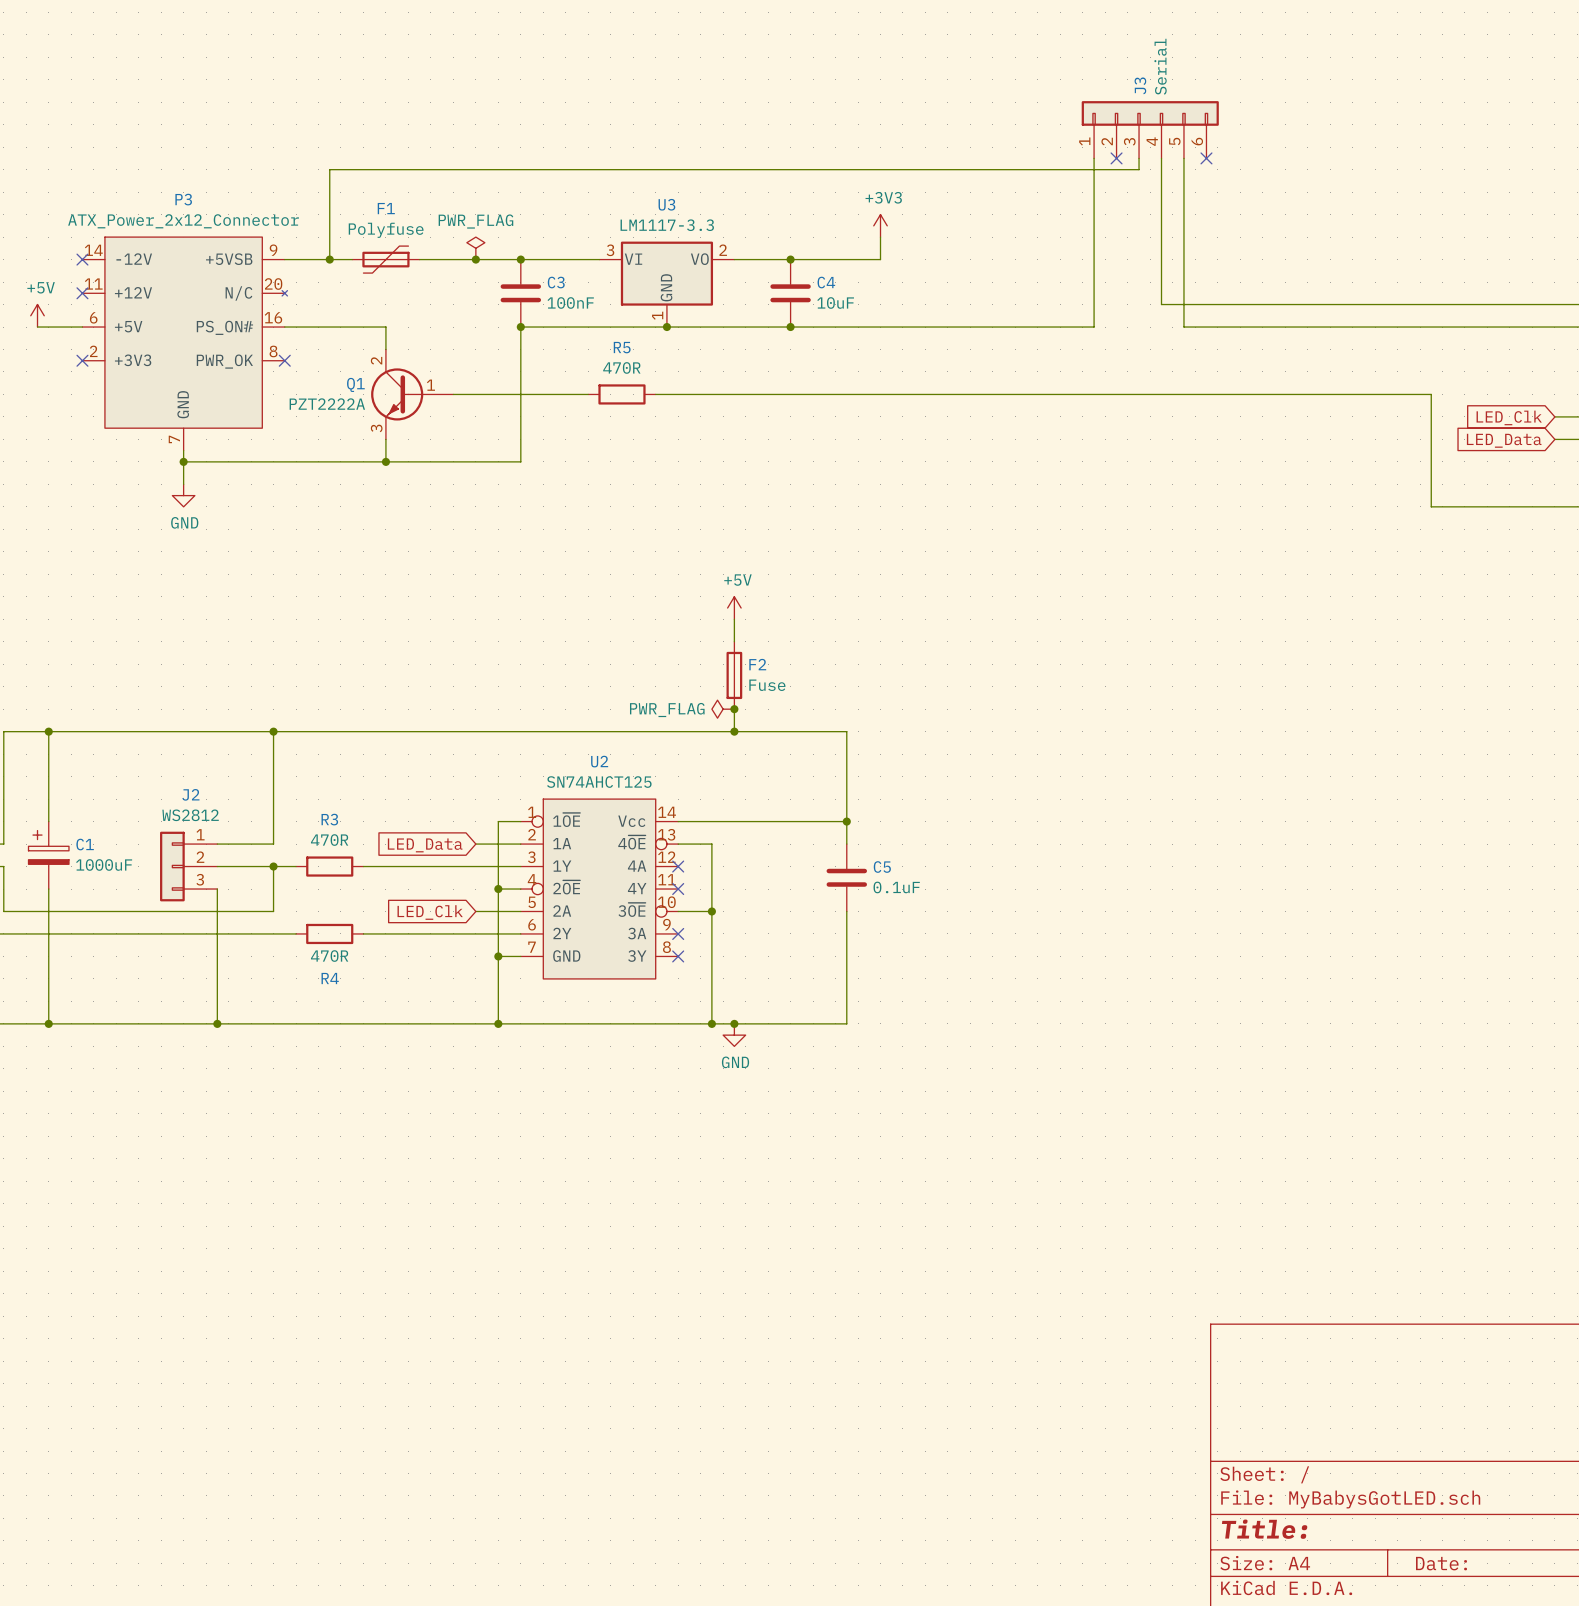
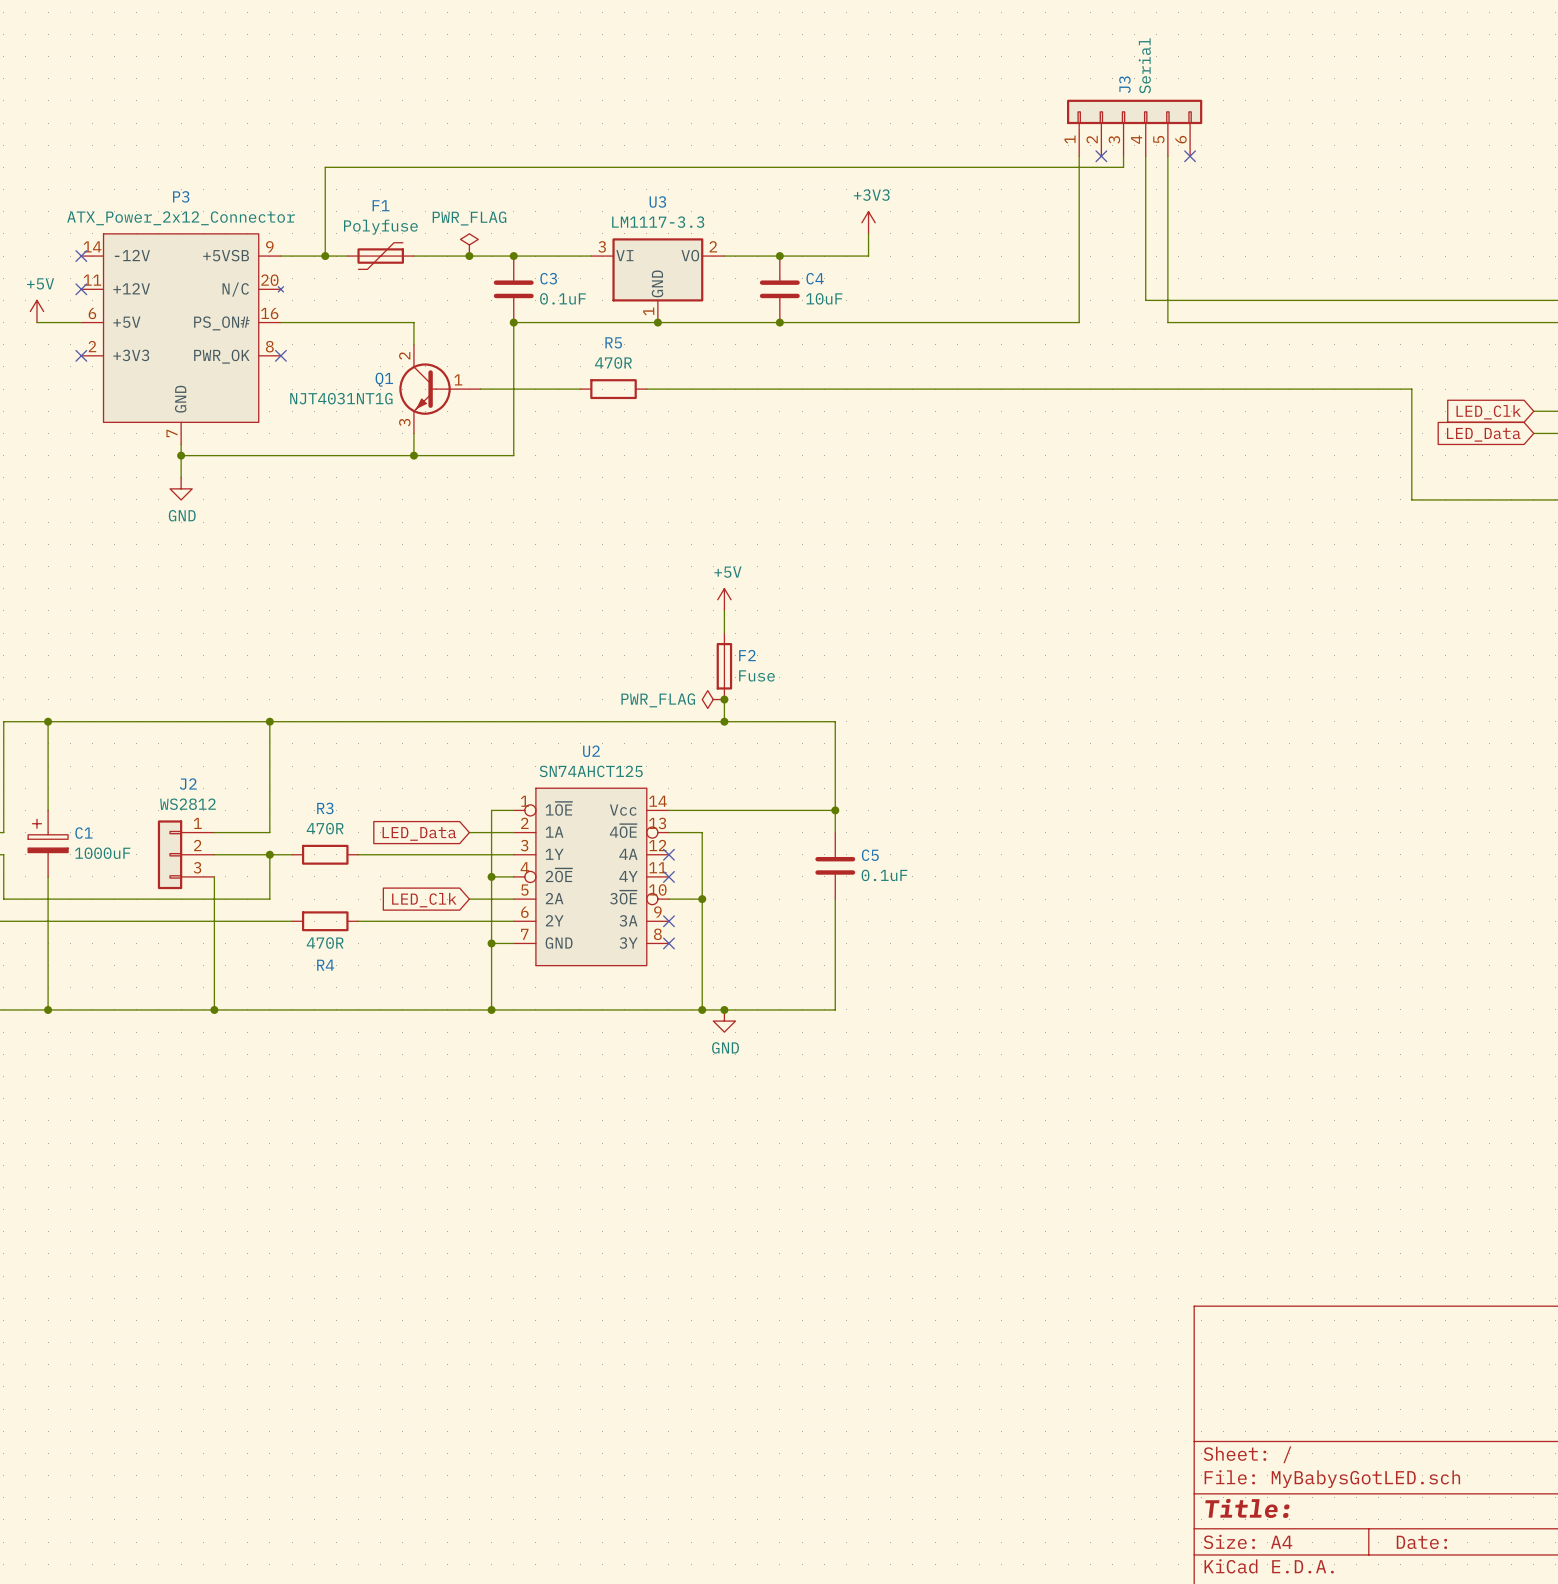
C3 value: 100nF (570, 302) -> 0.1uF (562, 298)
wire: (385, 327) (385, 349) -> (380, 322) (413, 322) (413, 344)
Q1 position: (412, 394) -> (439, 389)
Q1 value: PZT2222A (327, 404) -> NJT4031NT1G (341, 398)
wire: (385, 439) (385, 461) -> (413, 433) (413, 455)
junction position: (385, 461) -> (413, 455)

